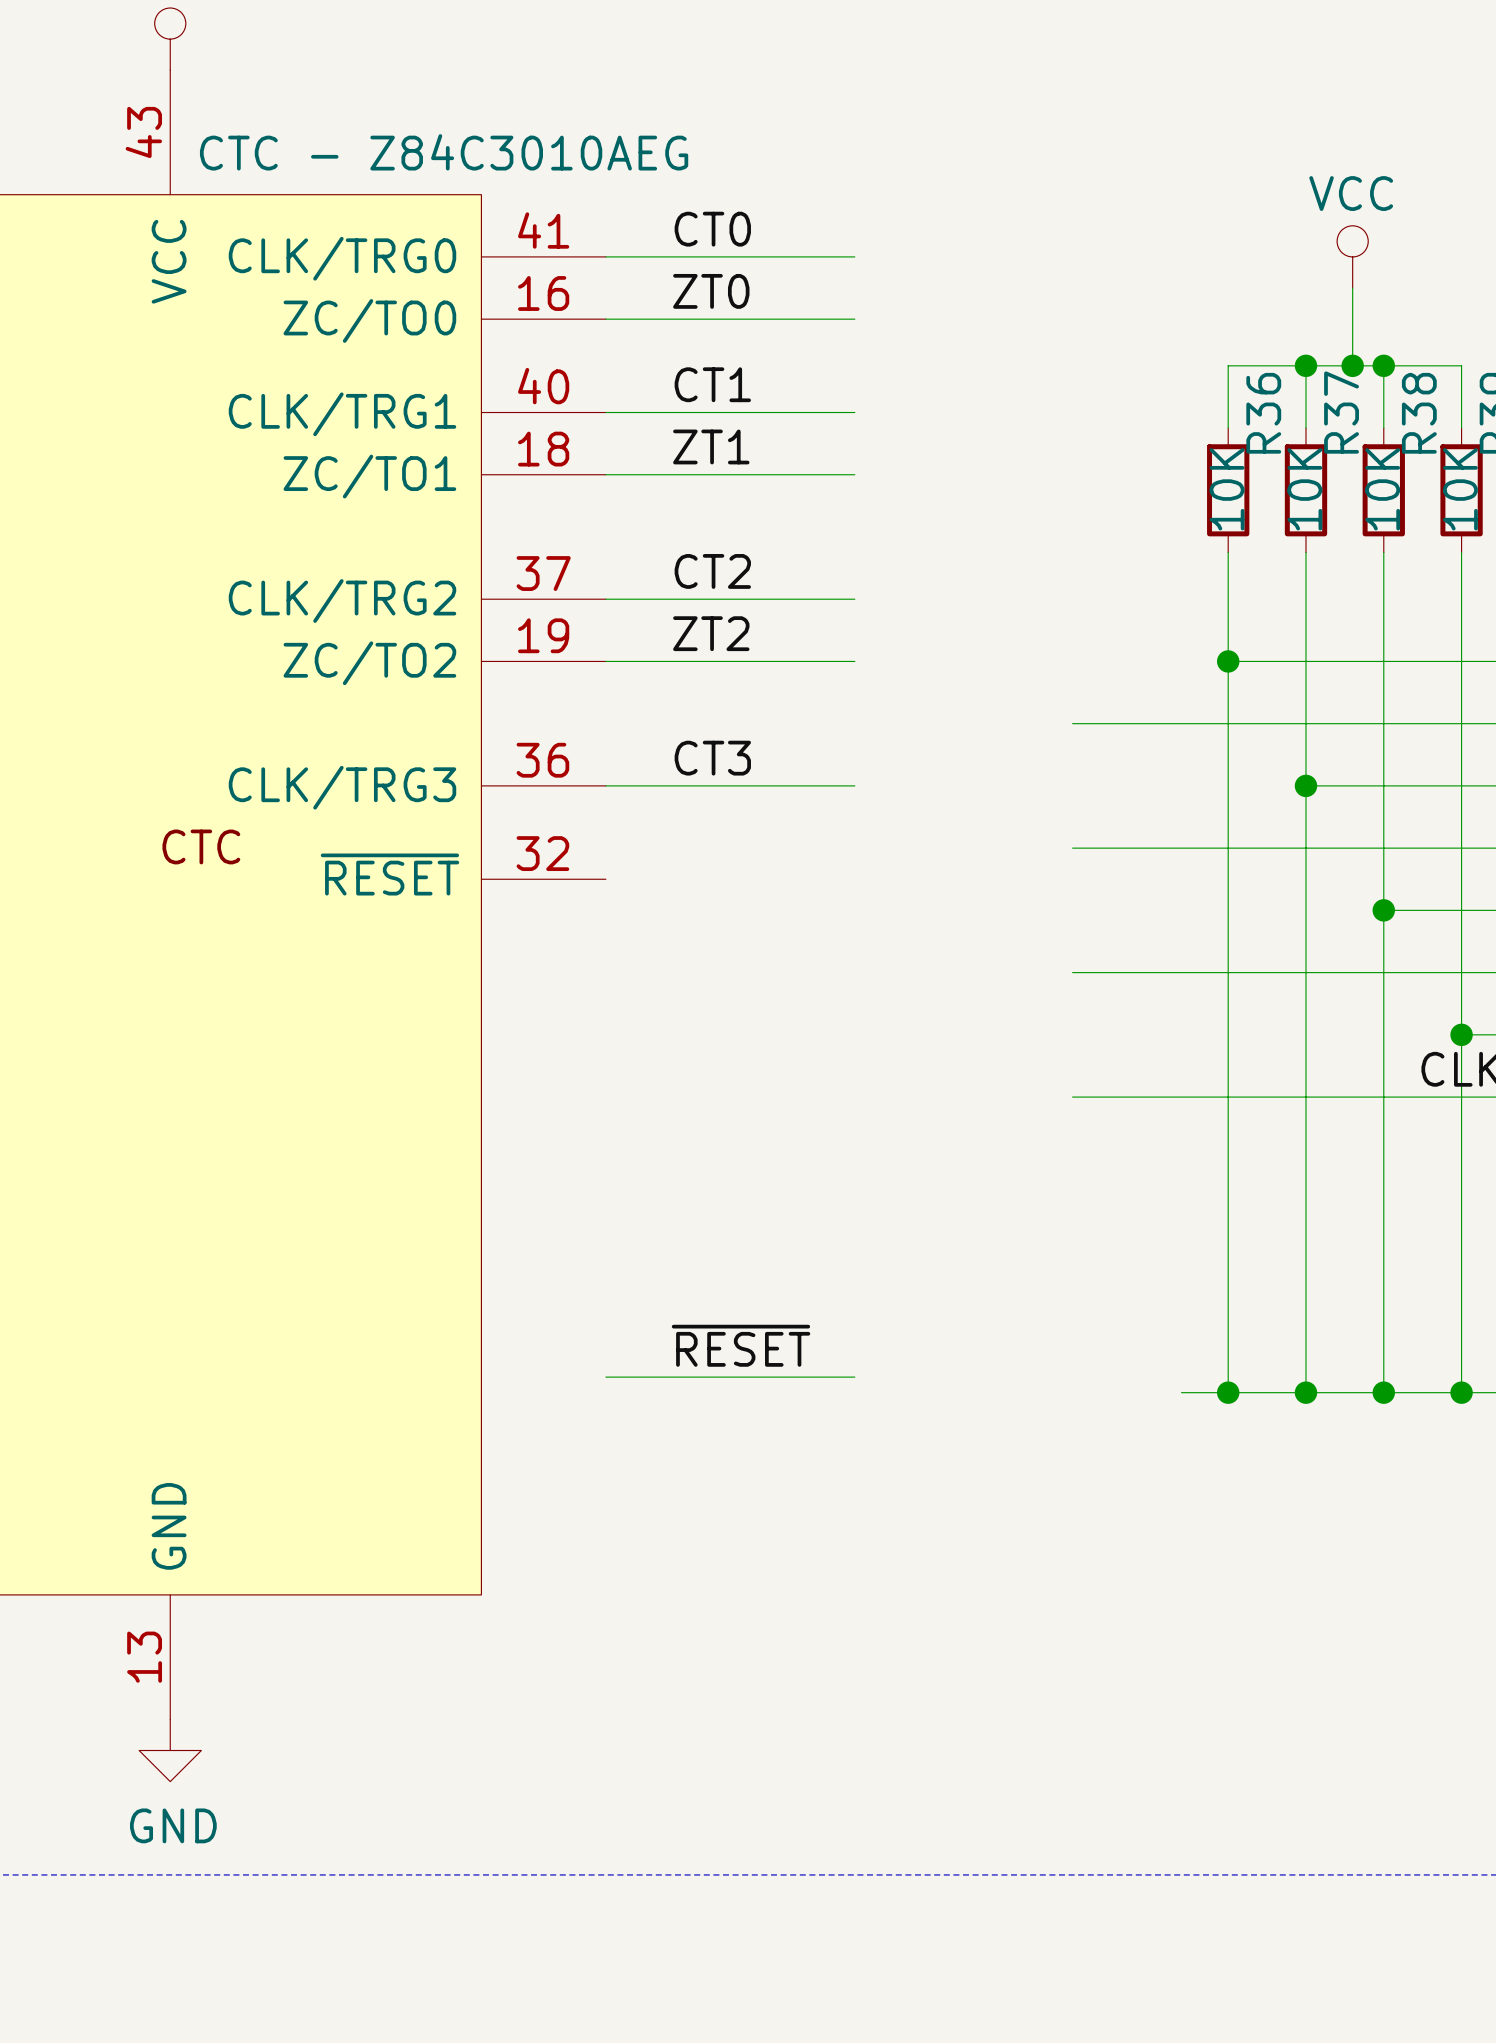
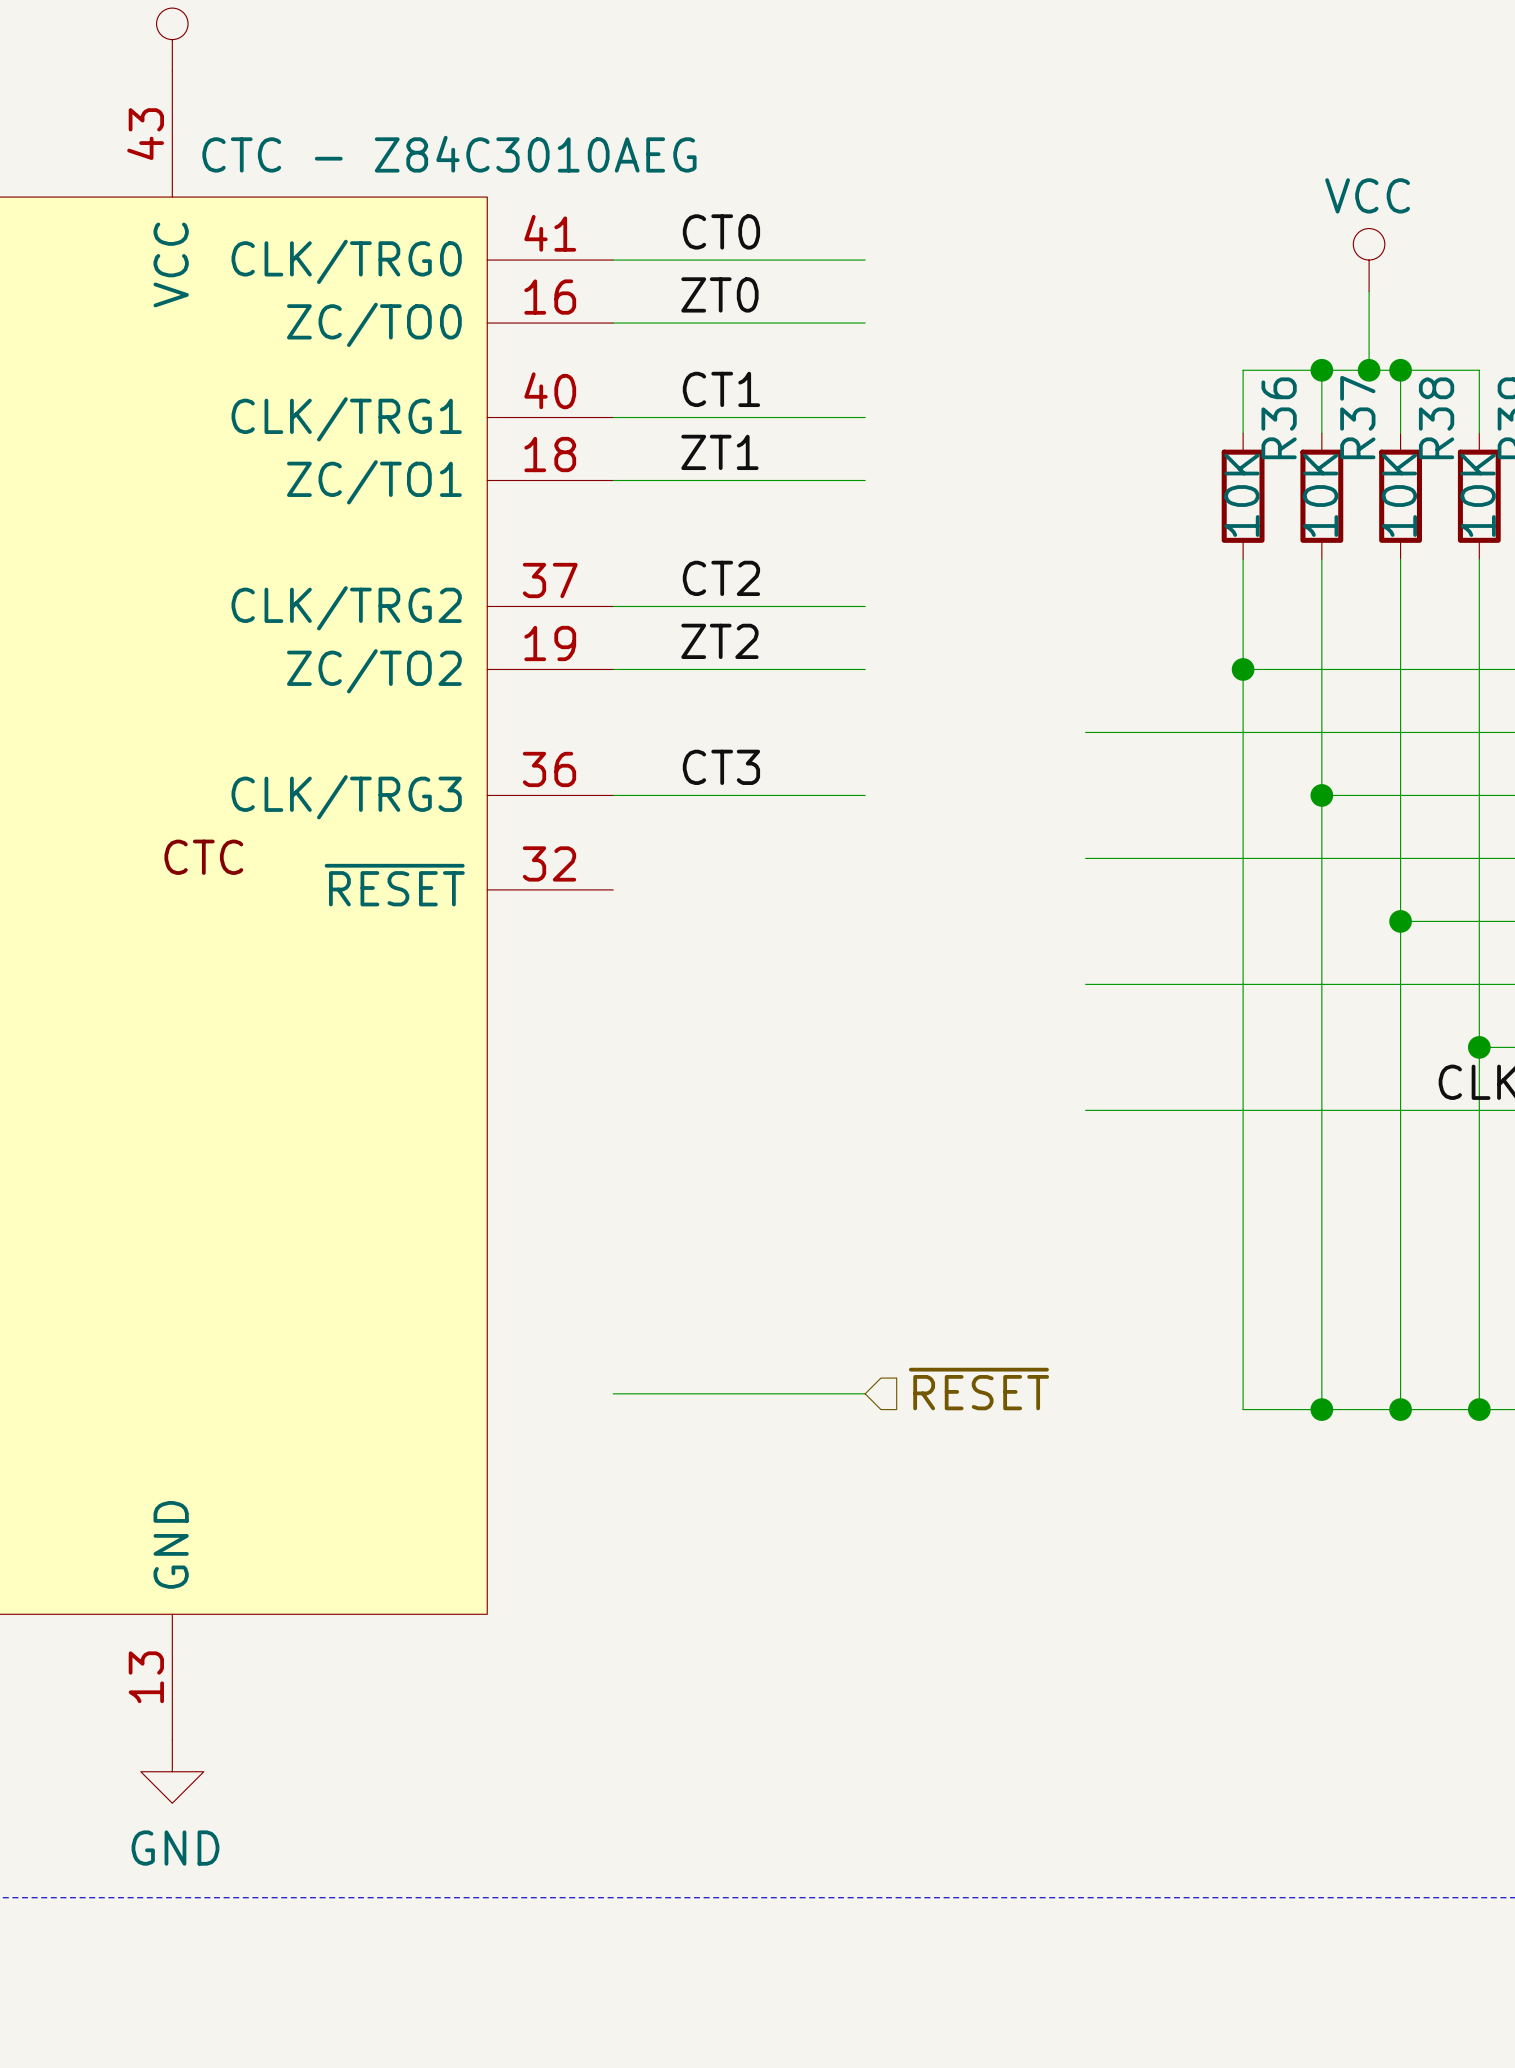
label: ~{RESET} (741, 1345) -> none
hierarchical label: none -> ~{RESET} (978, 1389)
wire: (1181, 1392) (1228, 1392) -> none
junction: (1228, 1392) -> none

